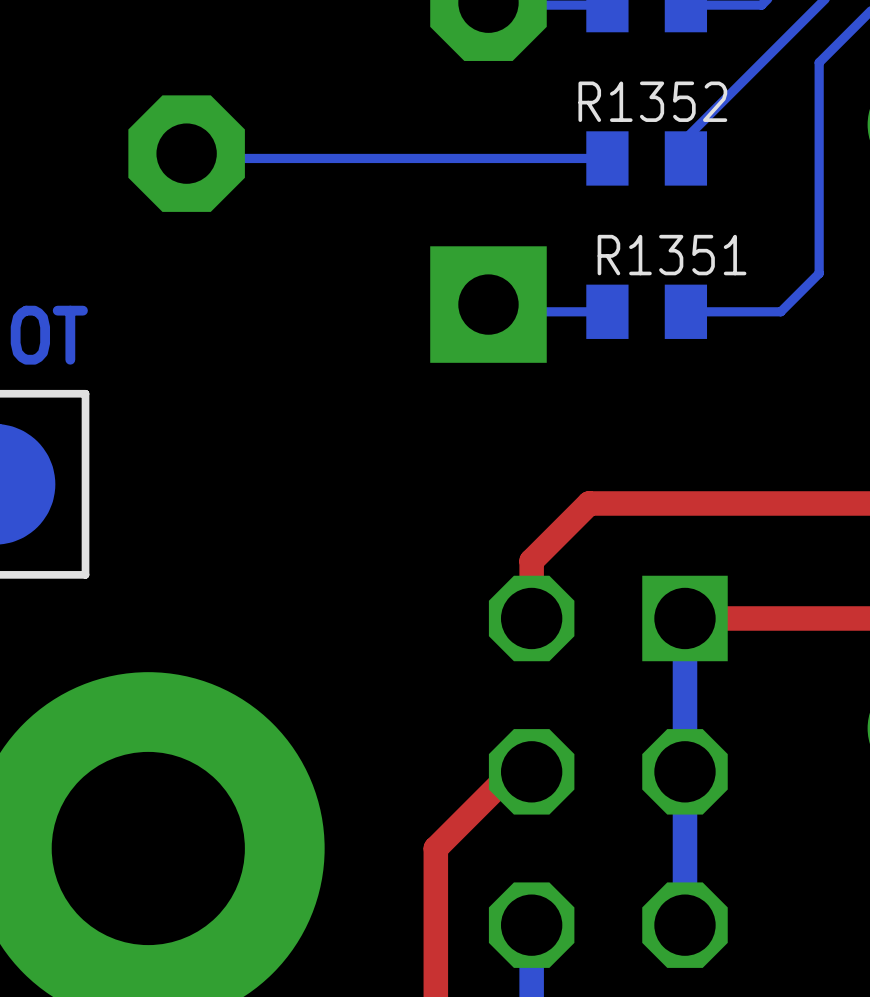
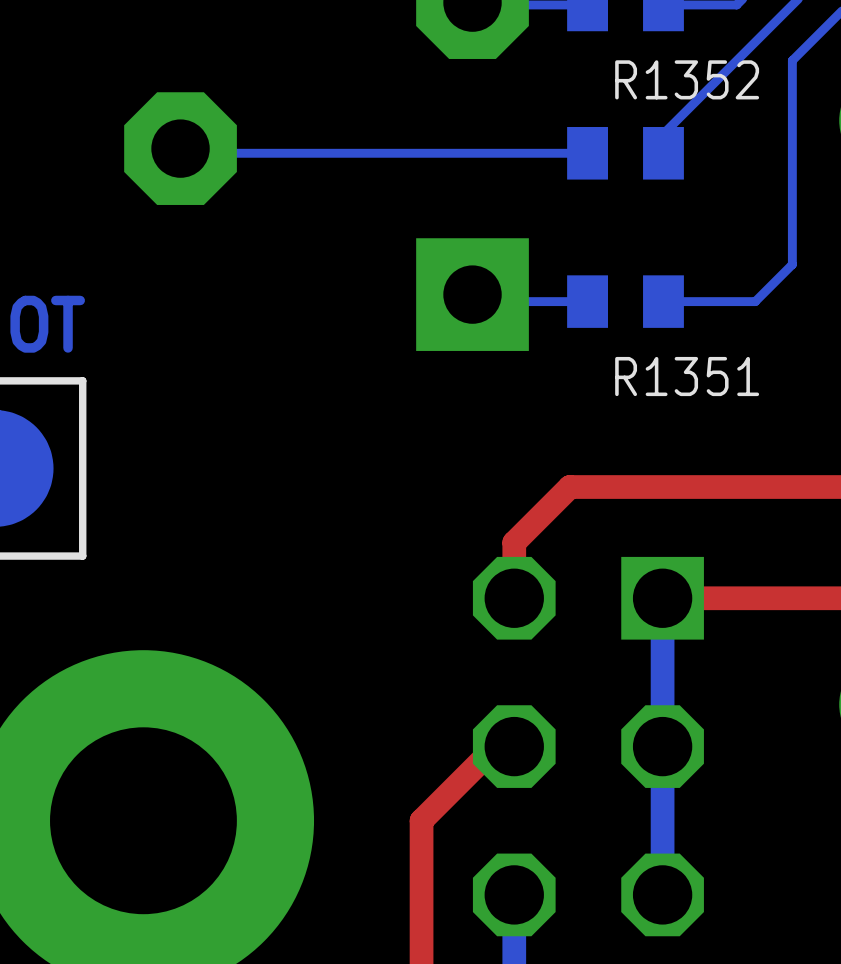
R1352 name position: R1352 (652, 101) -> R1352 (687, 79)
R1351 name position: R1351 (672, 255) -> R1351 (687, 376)

